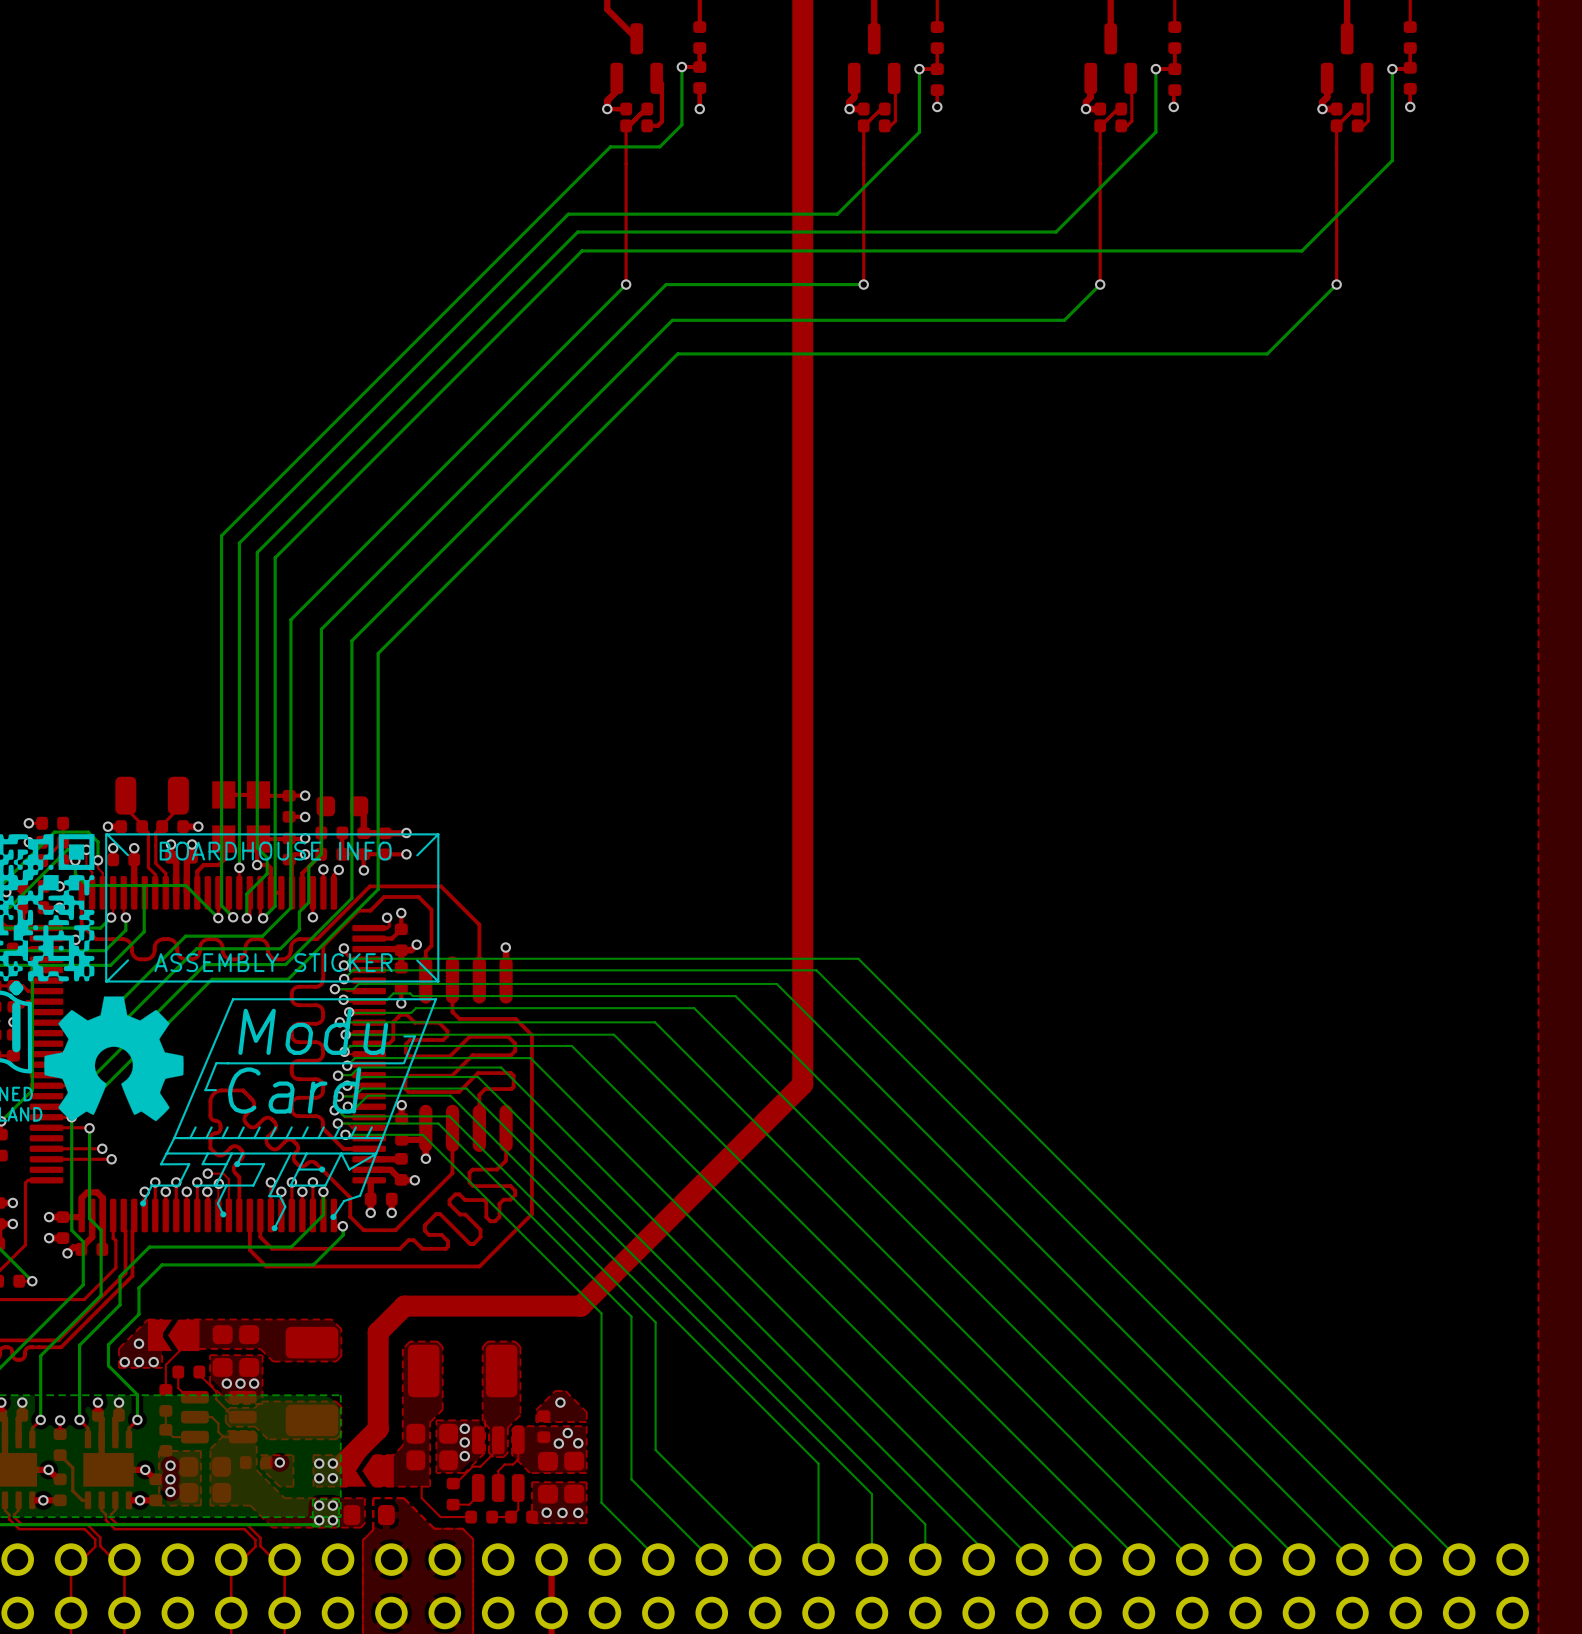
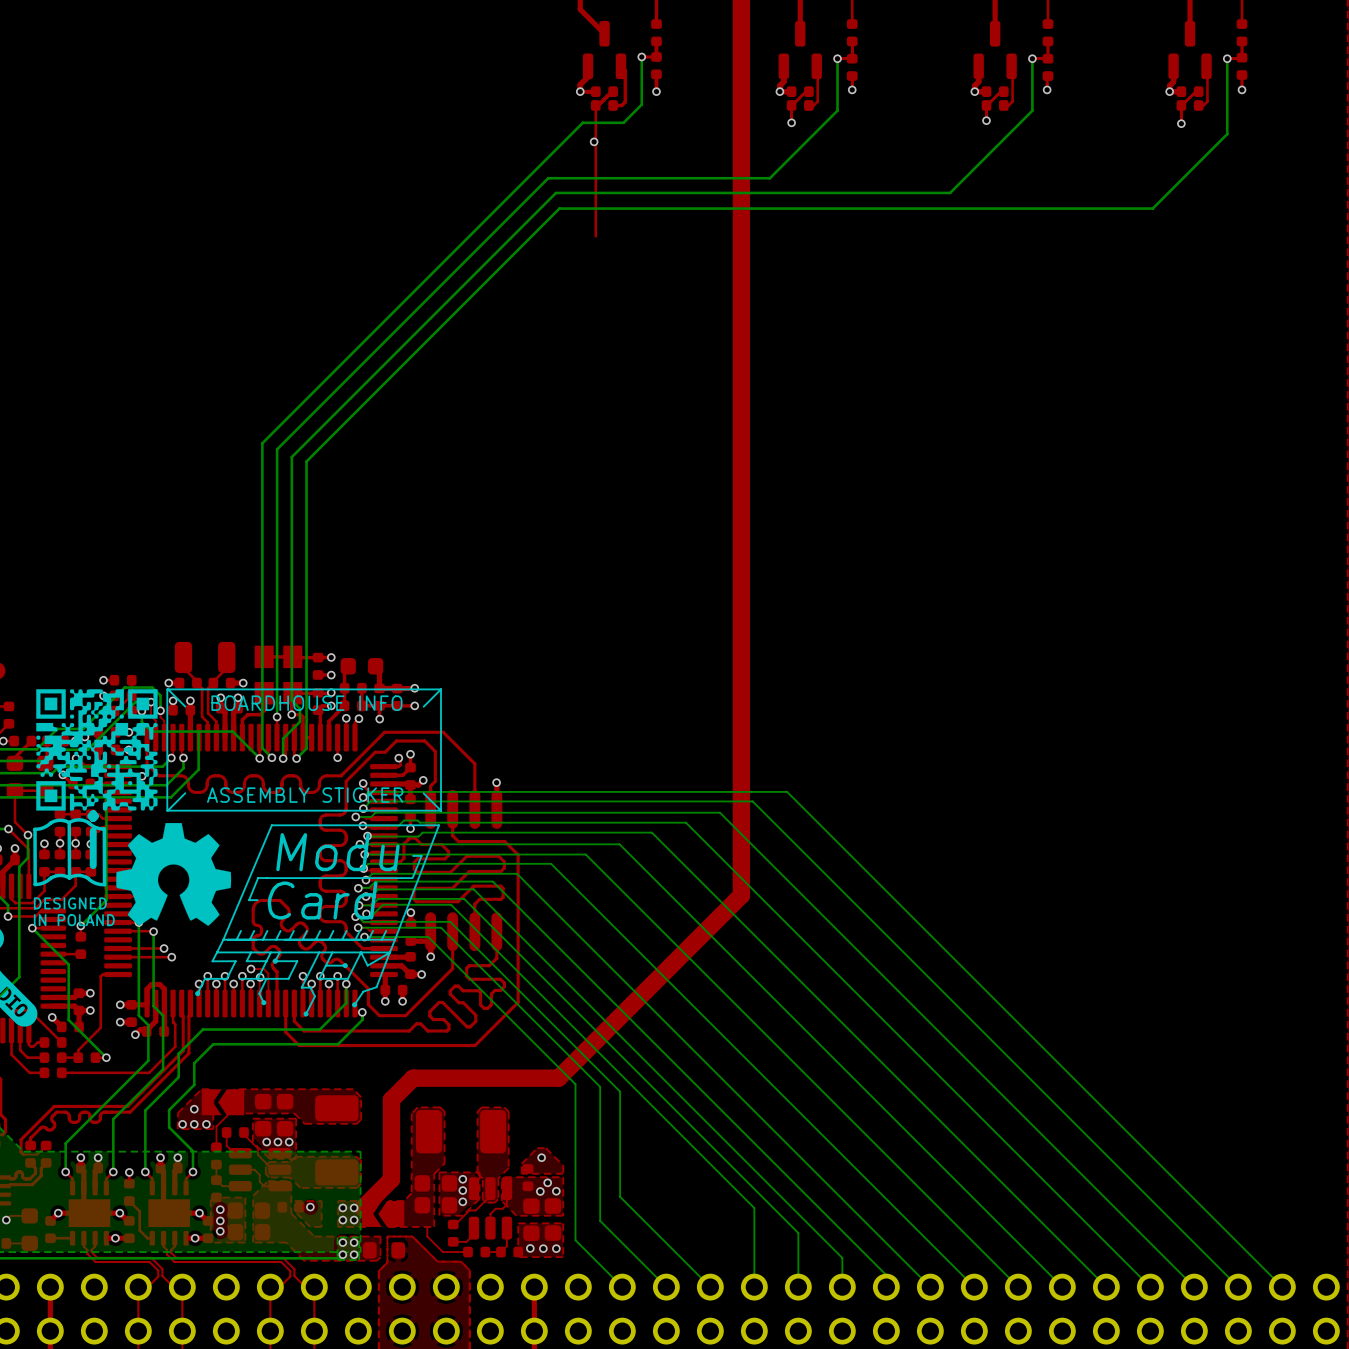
top track: (1100, 144) (1100, 284) -> none
via: none -> (986, 120)
top track: (863, 146) (863, 284) -> none
via: none -> (791, 122)
top track: (1336, 147) (1336, 284) -> none
via: none -> (1181, 123)
bottom track: (626, 284) (290, 619) (290, 907) (262, 936) (185, 936) (67, 1054) -> none
via position: (626, 284) -> (594, 141)
bottom track: (863, 284) (666, 284) (321, 629) (321, 854) (308, 866) (308, 902) (299, 911) (299, 929) (280, 948) (196, 948) (80, 1064) -> none
via: (863, 284) -> none
bottom track: (1100, 284) (1064, 320) (672, 320) (351, 640) (351, 898) (285, 964) (205, 964) (94, 1075) (68, 1075) -> none
via: (1100, 284) -> none
bottom track: (1336, 284) (1267, 353) (677, 353) (378, 653) (378, 889) (288, 979) (212, 979) (105, 1085) (79, 1085) -> none
via: (1336, 284) -> none

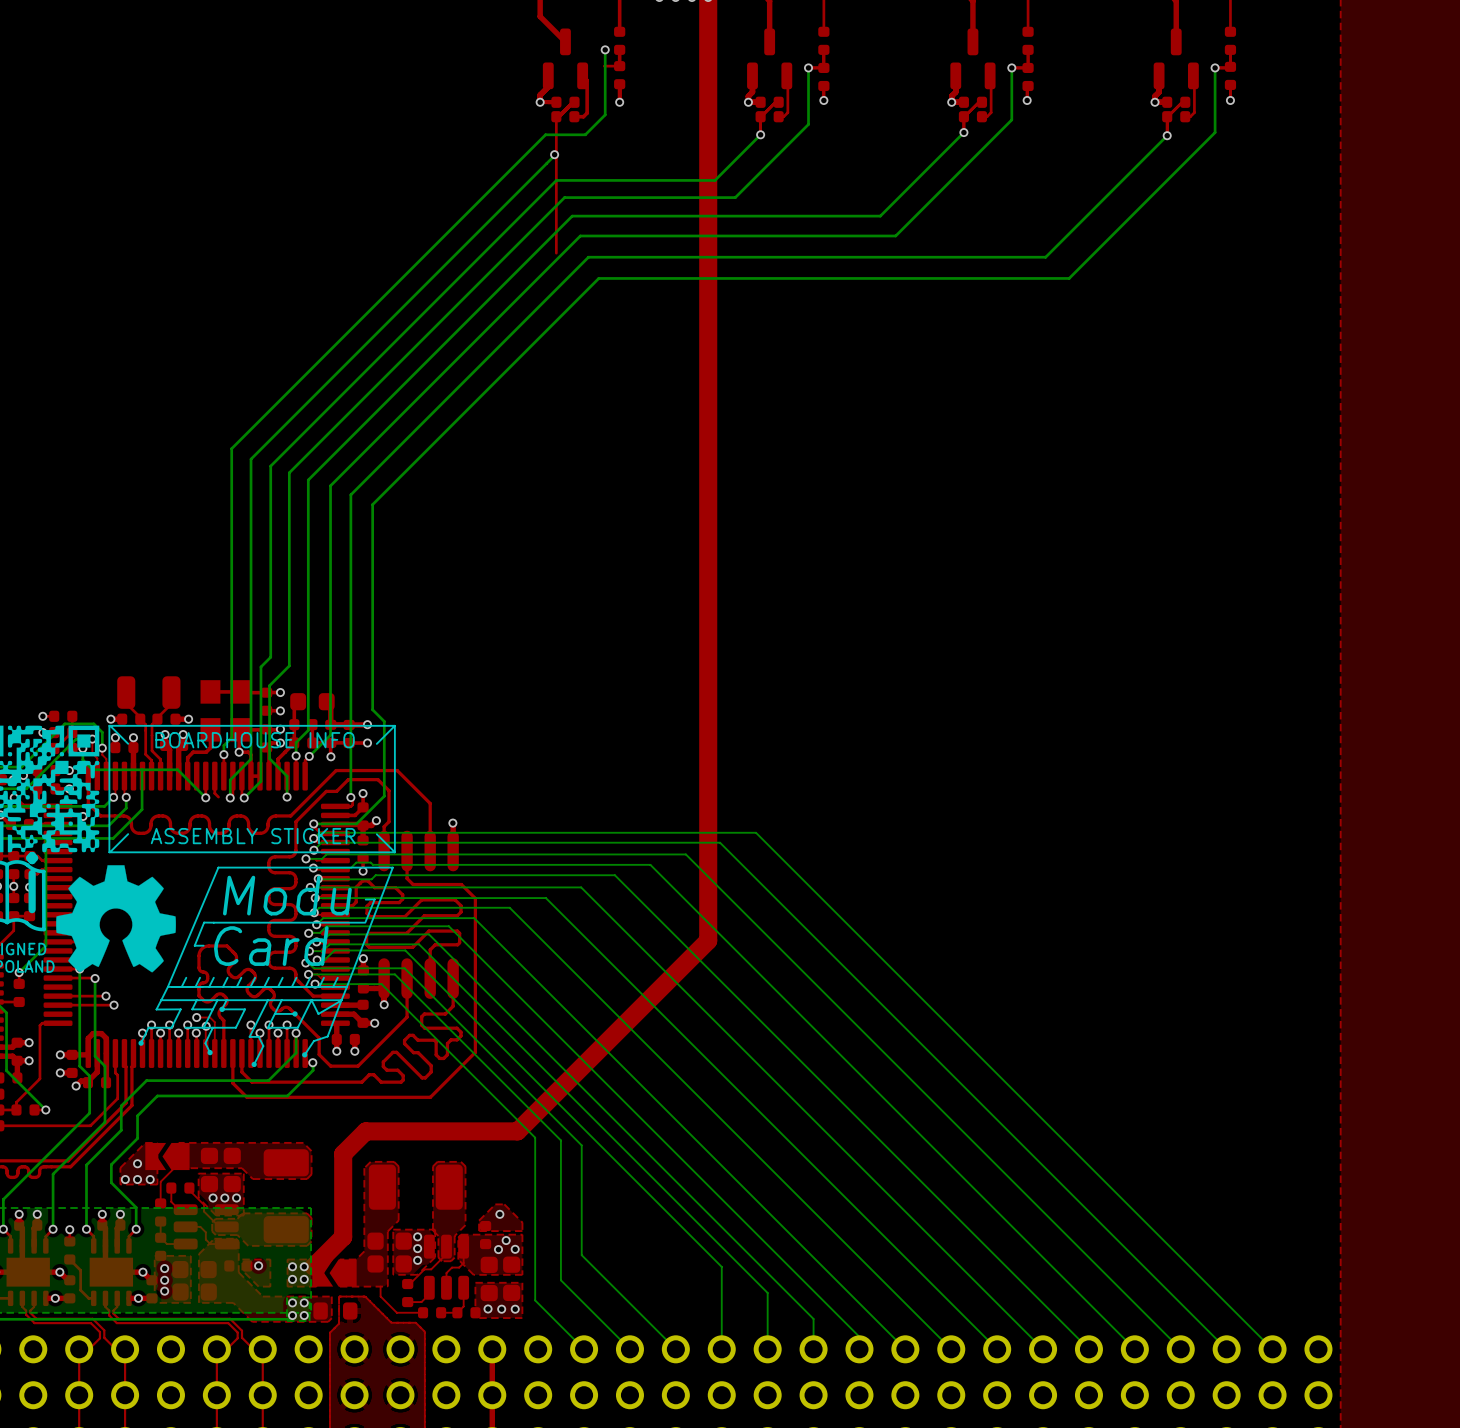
bottom track: (641, 56) (641, 104) -> (605, 49) (604, 115)
via position: (641, 56) -> (605, 49)
bottom track: (1032, 108) (1032, 110) (950, 192) (555, 192) (291, 457) (291, 700) (299, 708) (299, 721) (283, 738) (283, 741) -> (1011, 119) (895, 235) (580, 235) (330, 485) (330, 735) (309, 756)
bottom track: (837, 110) (769, 178) (548, 178) (277, 449) (277, 708) -> (808, 122) (808, 124) (735, 197) (564, 197) (289, 472) (289, 665) (269, 685) (269, 758) (287, 776) (287, 797)
bottom track: none -> (963, 132) (880, 216) (572, 216) (308, 480) (308, 730) (296, 742) (296, 755)
bottom track: (1227, 120) (1227, 134) (1152, 208) (559, 208) (306, 461) (306, 748) -> (1215, 132) (1069, 278) (598, 278) (372, 504) (372, 709) (384, 721) (384, 796) (356, 823) (313, 823)
bottom track: (585, 122) (582, 122) (262, 443) (262, 748) (271, 757) -> (545, 134) (231, 448) (231, 737) (223, 745)
bottom track: none -> (760, 134) (714, 180) (556, 180) (270, 466) (270, 657) (260, 666) (260, 781) (254, 787)
bottom track: none -> (1167, 135) (1045, 257) (588, 257) (350, 494) (350, 797)
bottom track: none -> (554, 154) (251, 459) (251, 759) (230, 779)
via: (271, 757) -> none

